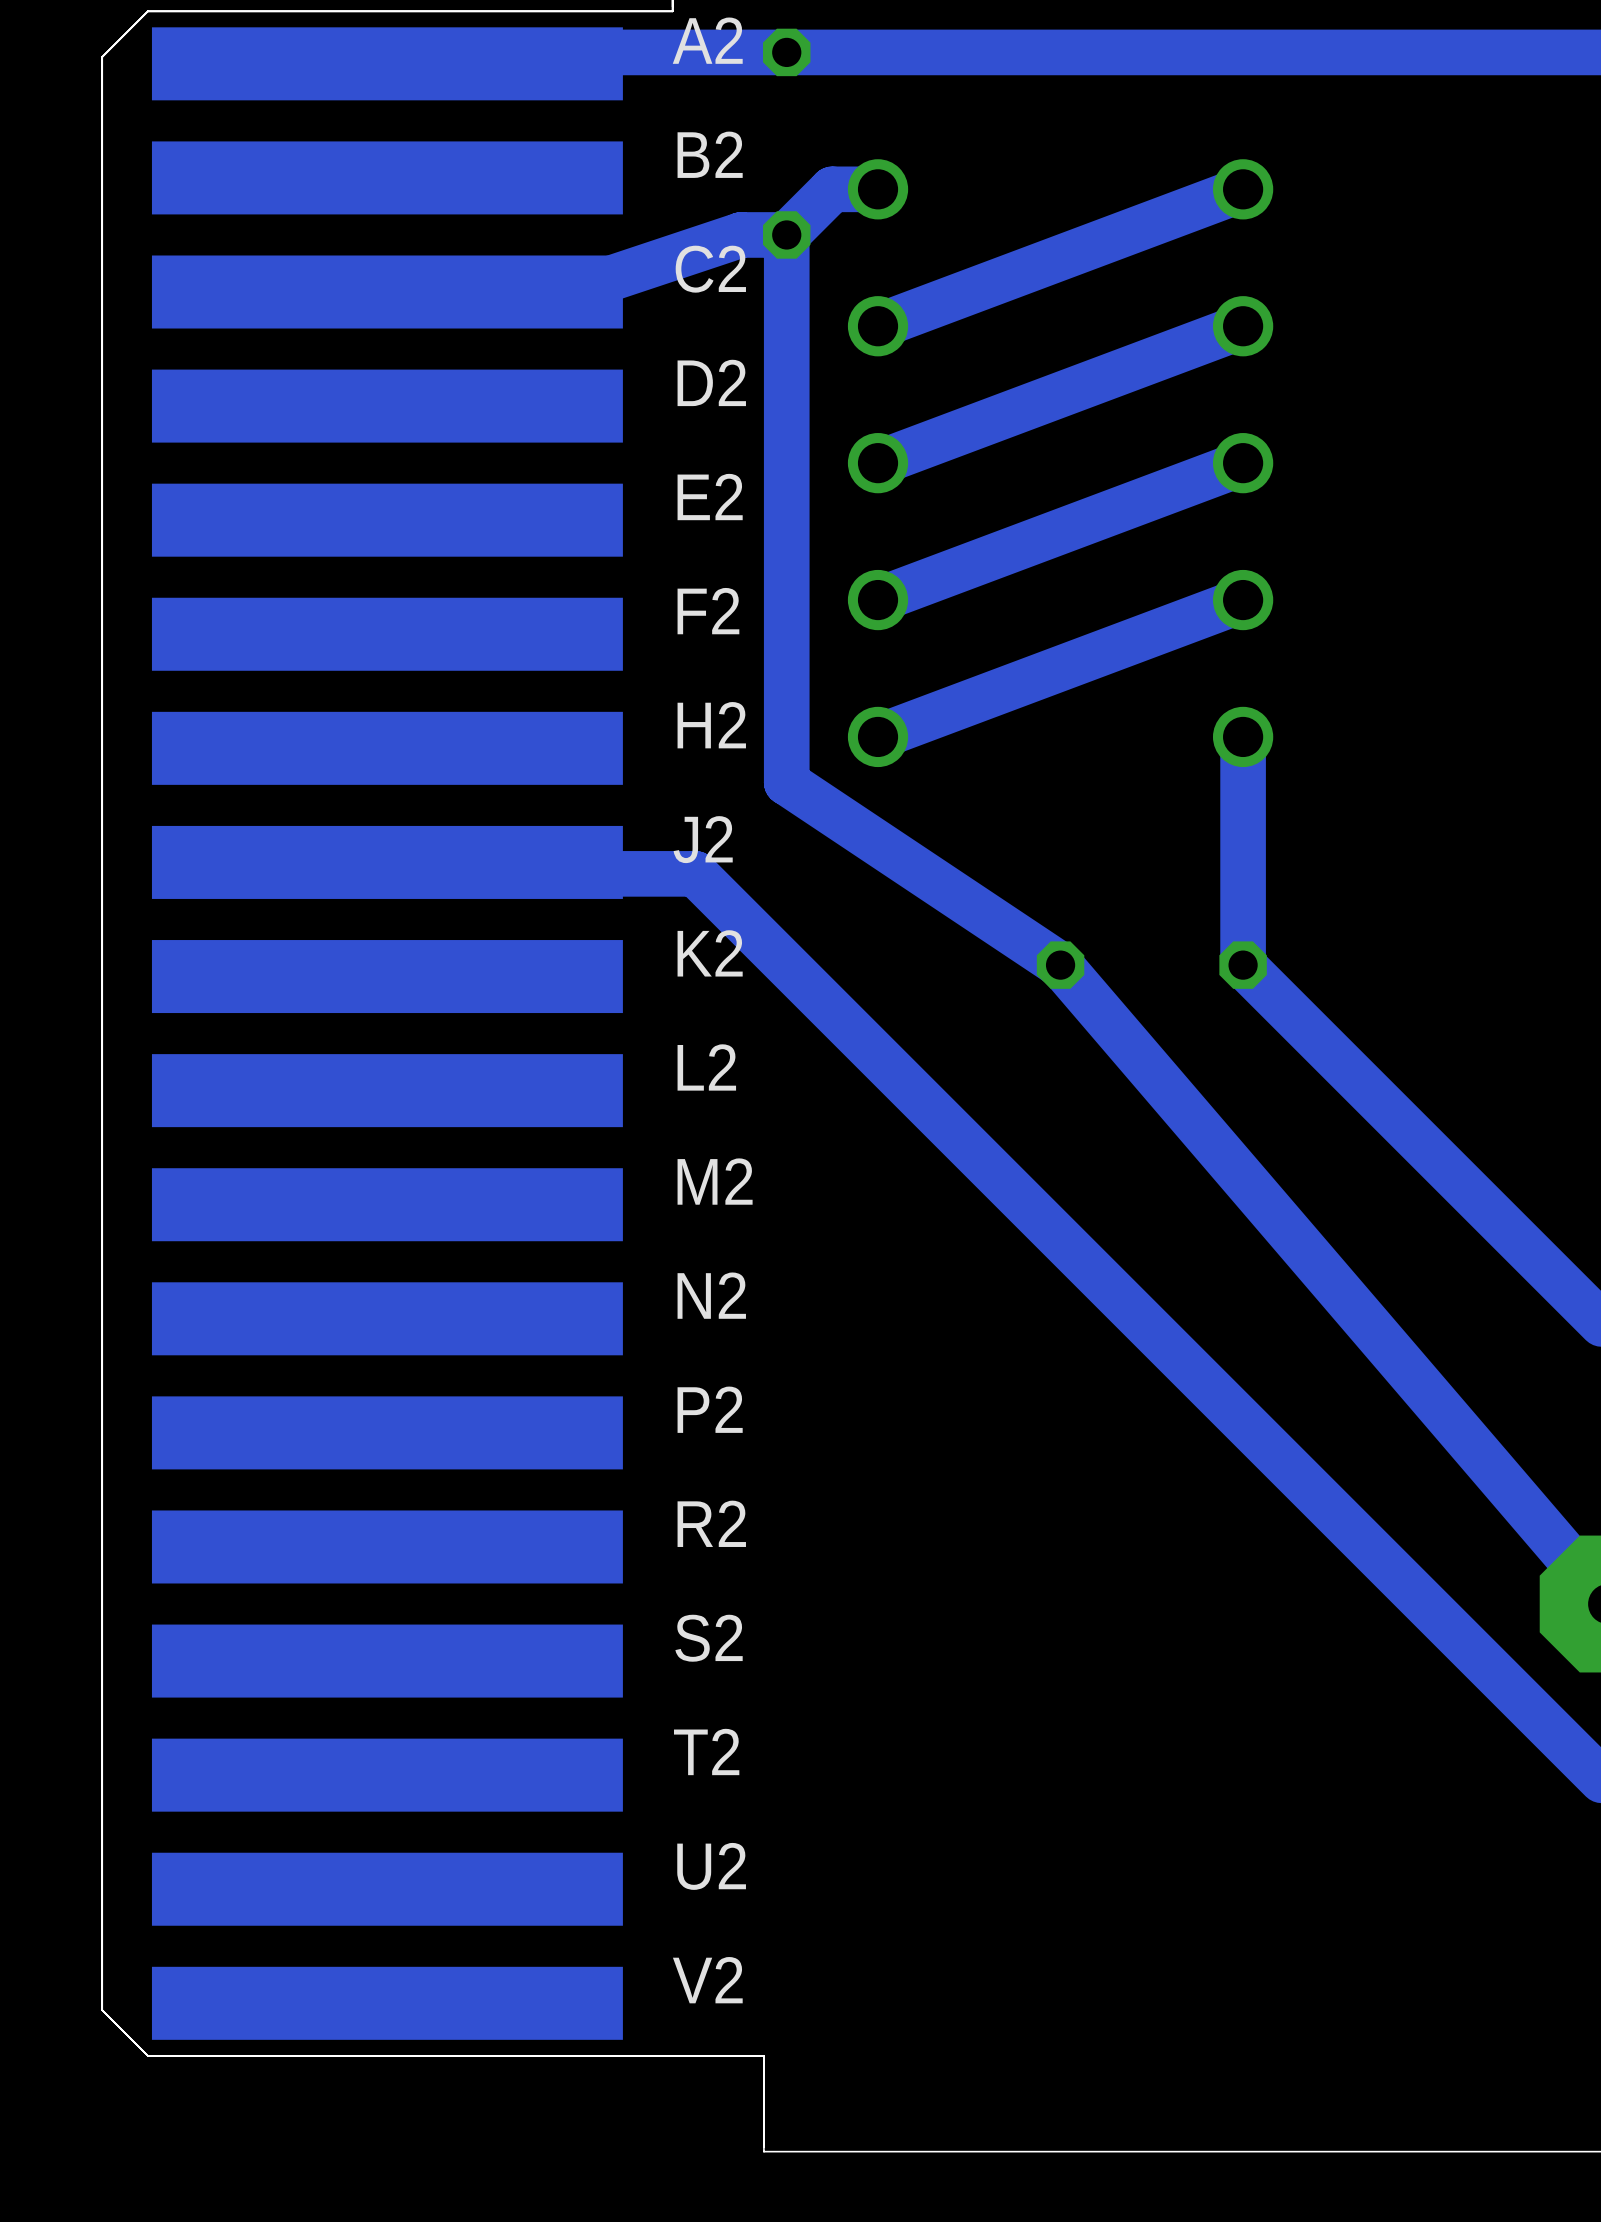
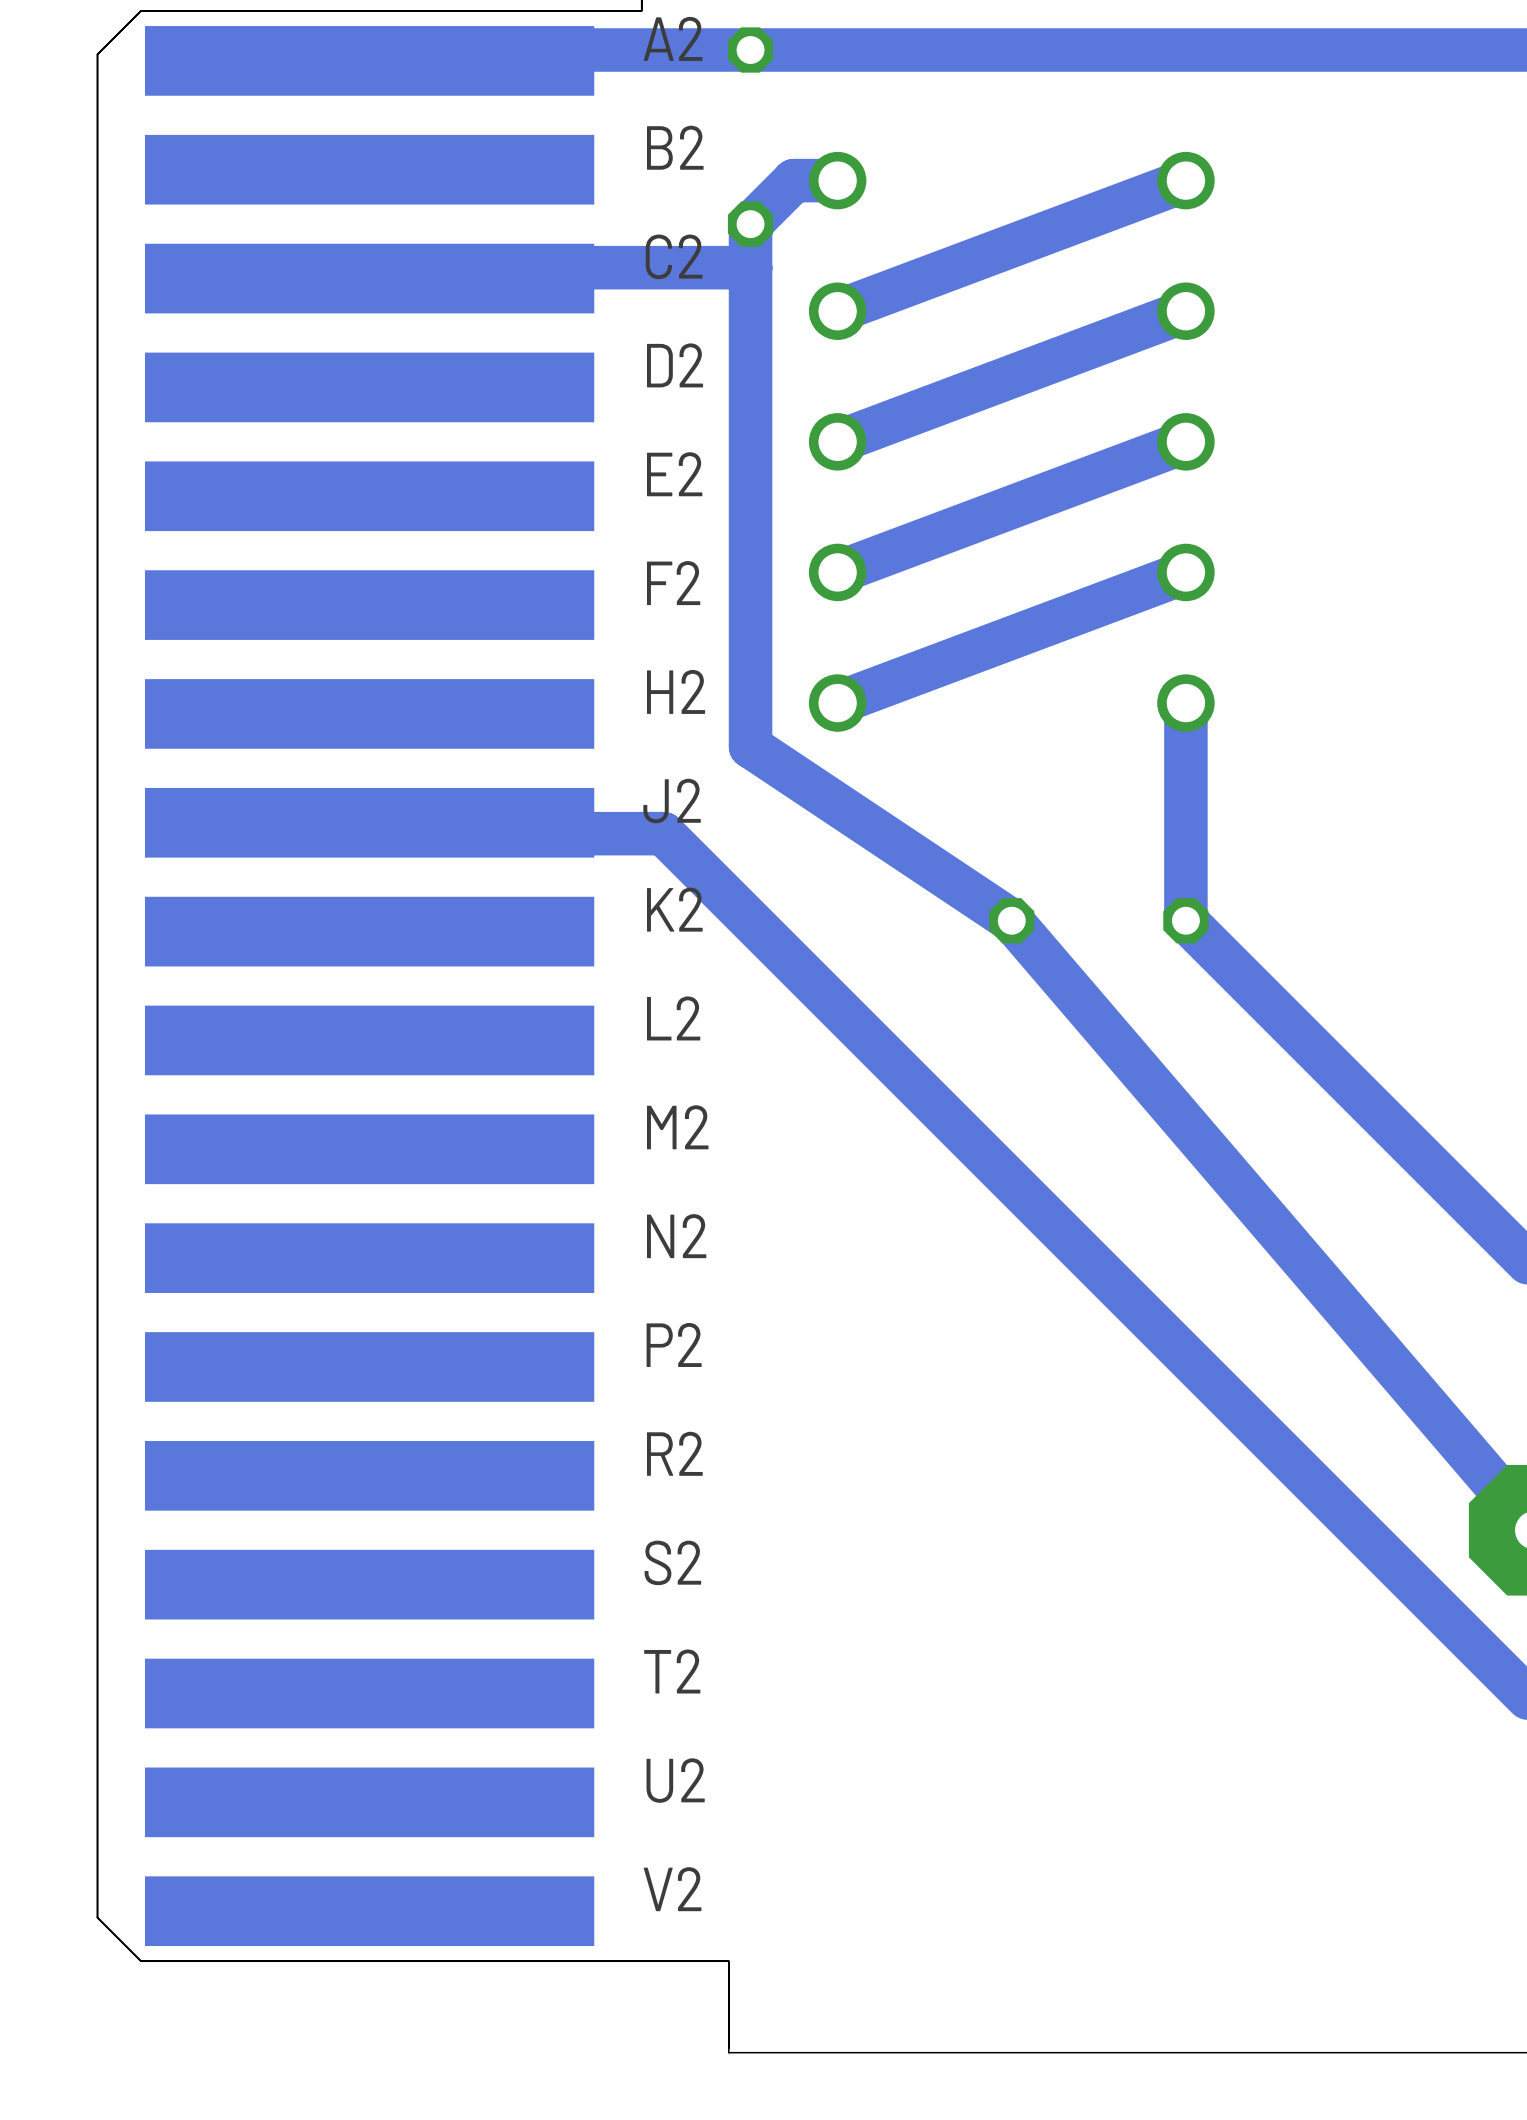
bottom track: (786, 234) (741, 234) (604, 280) -> (750, 267) (576, 267)

